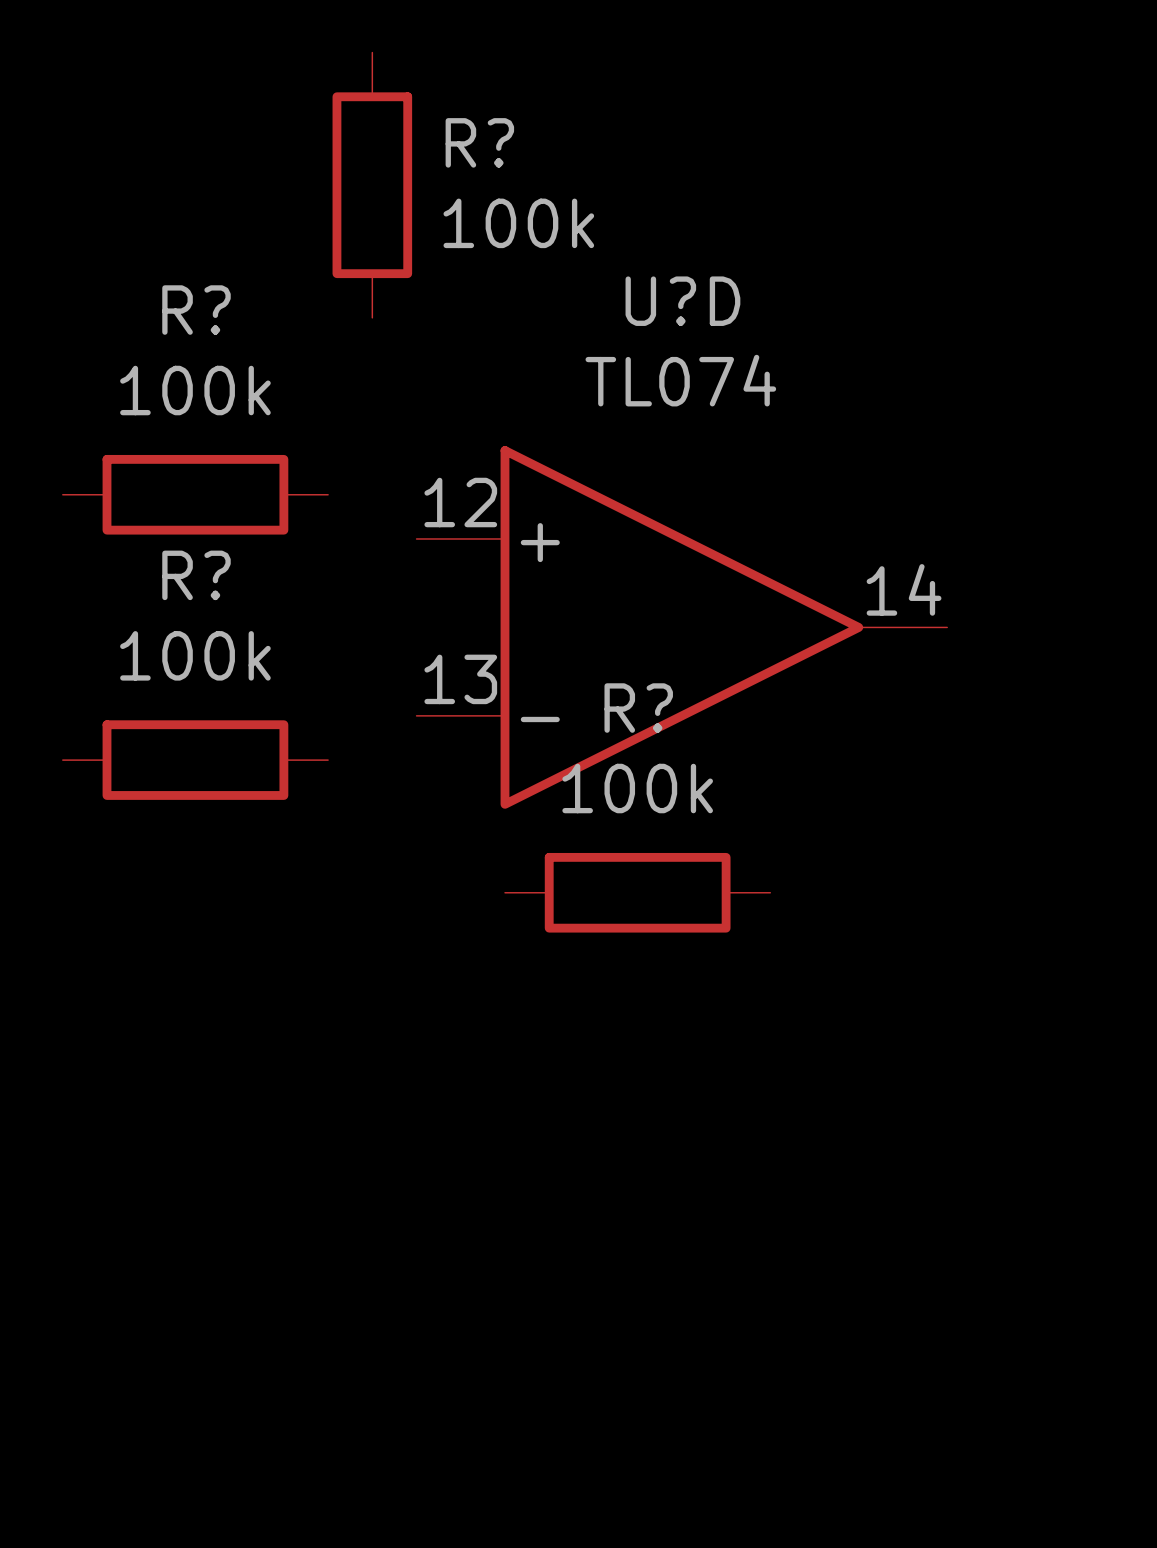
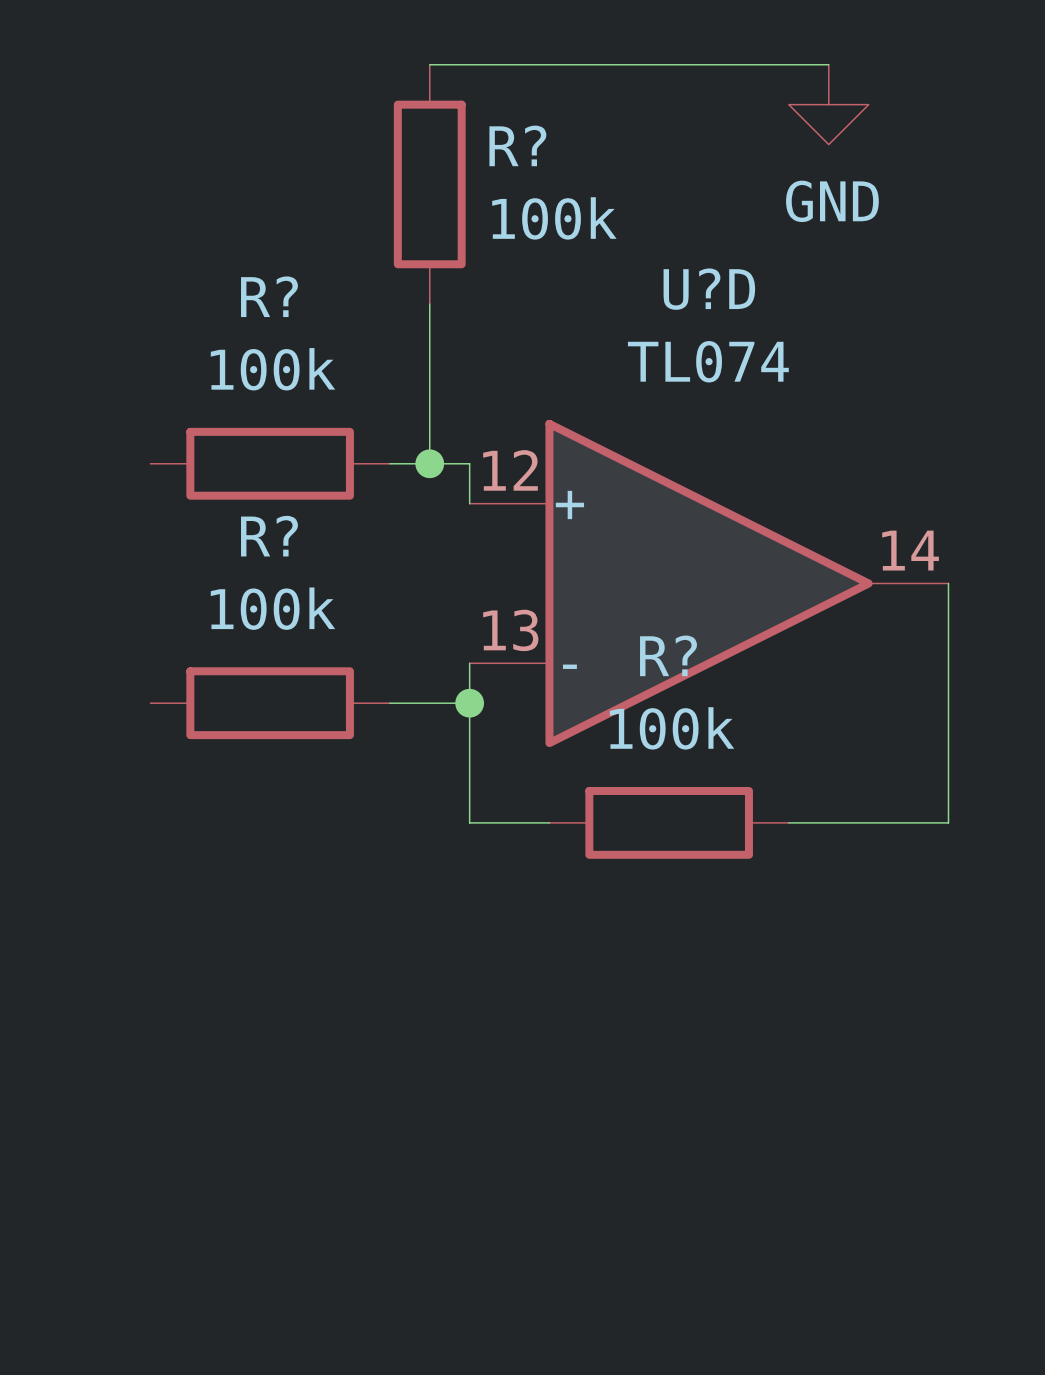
wire: none -> (429, 64) (828, 64)
power symbol: none -> GND (828, 104)
wire: none -> (429, 304) (429, 463)
wire: none -> (389, 463) (469, 463) (469, 503)
junction: none -> (429, 463)
wire: none -> (948, 583) (948, 822) (788, 822)
wire: none -> (469, 663) (469, 822) (549, 822)
wire: none -> (389, 703) (469, 703)
junction: none -> (469, 703)

